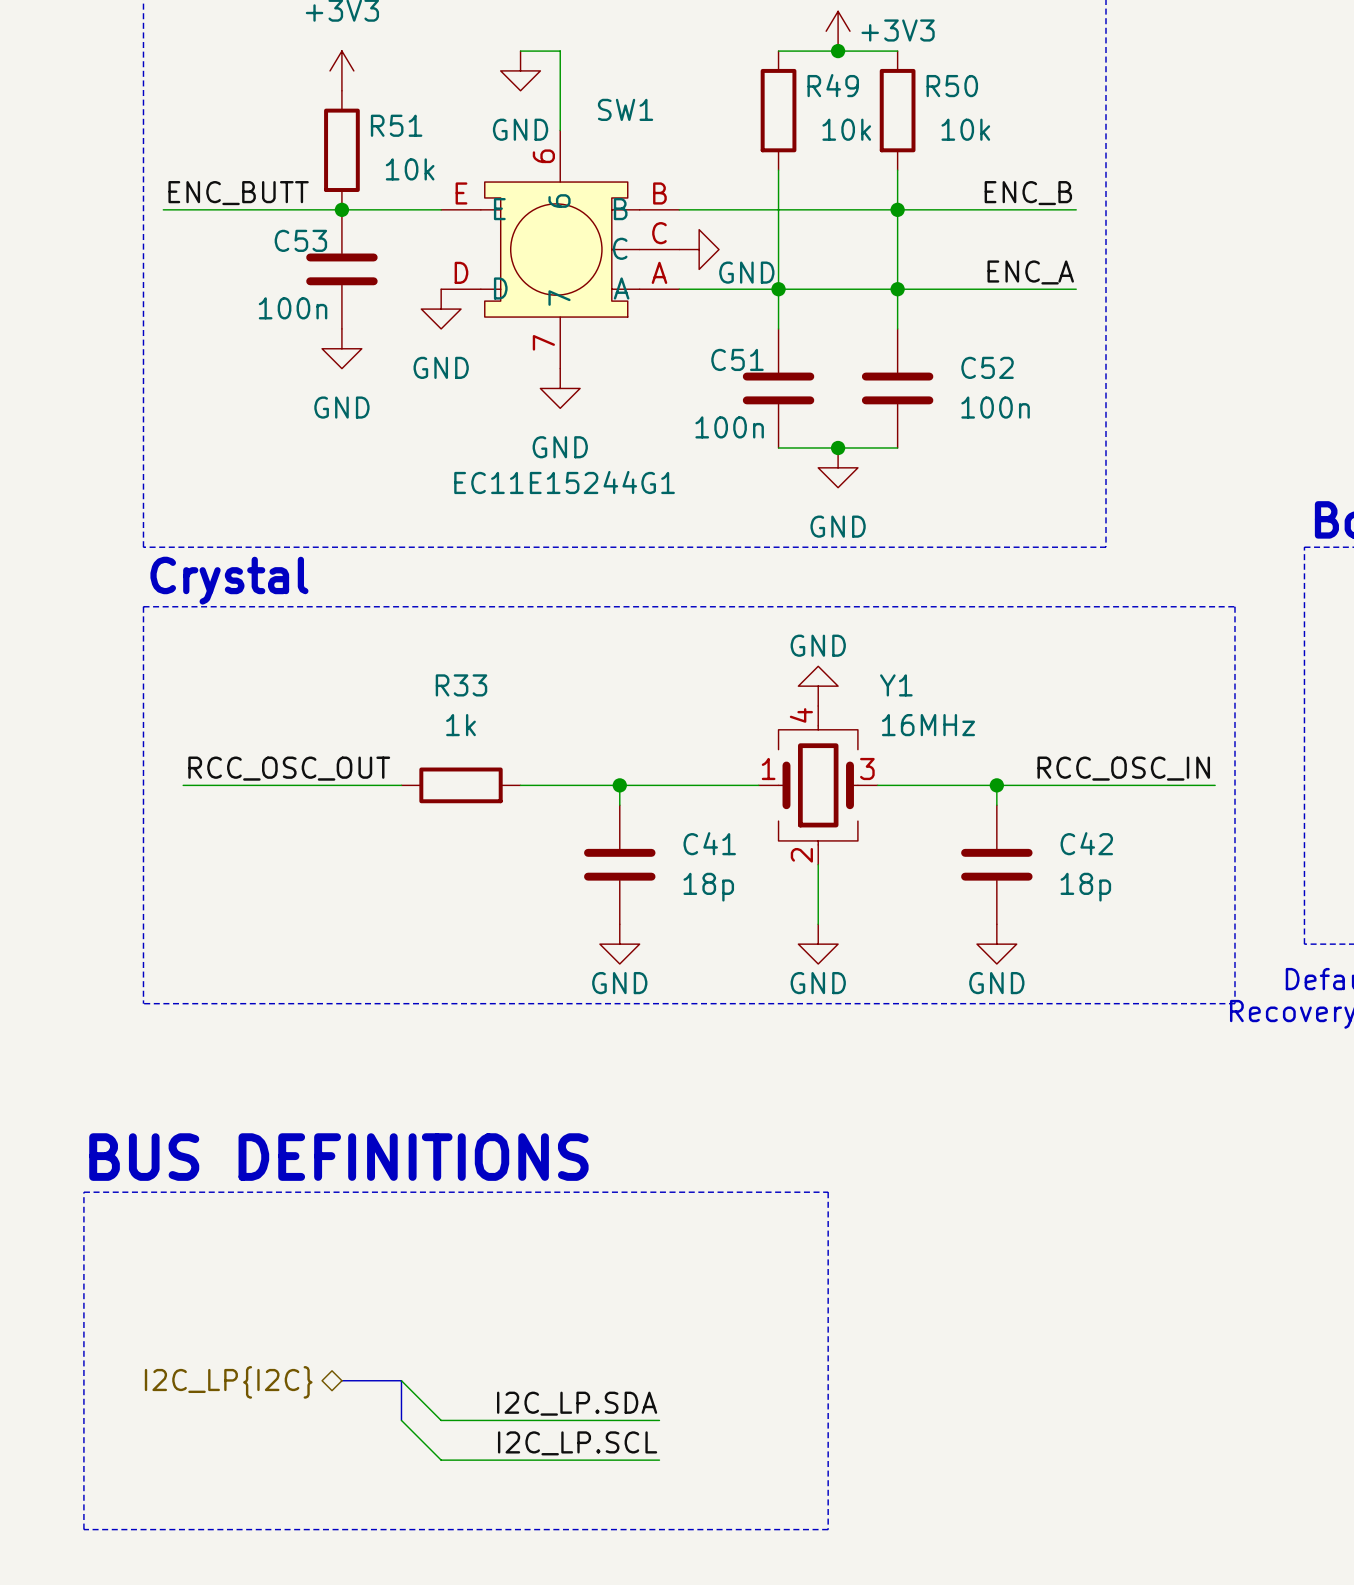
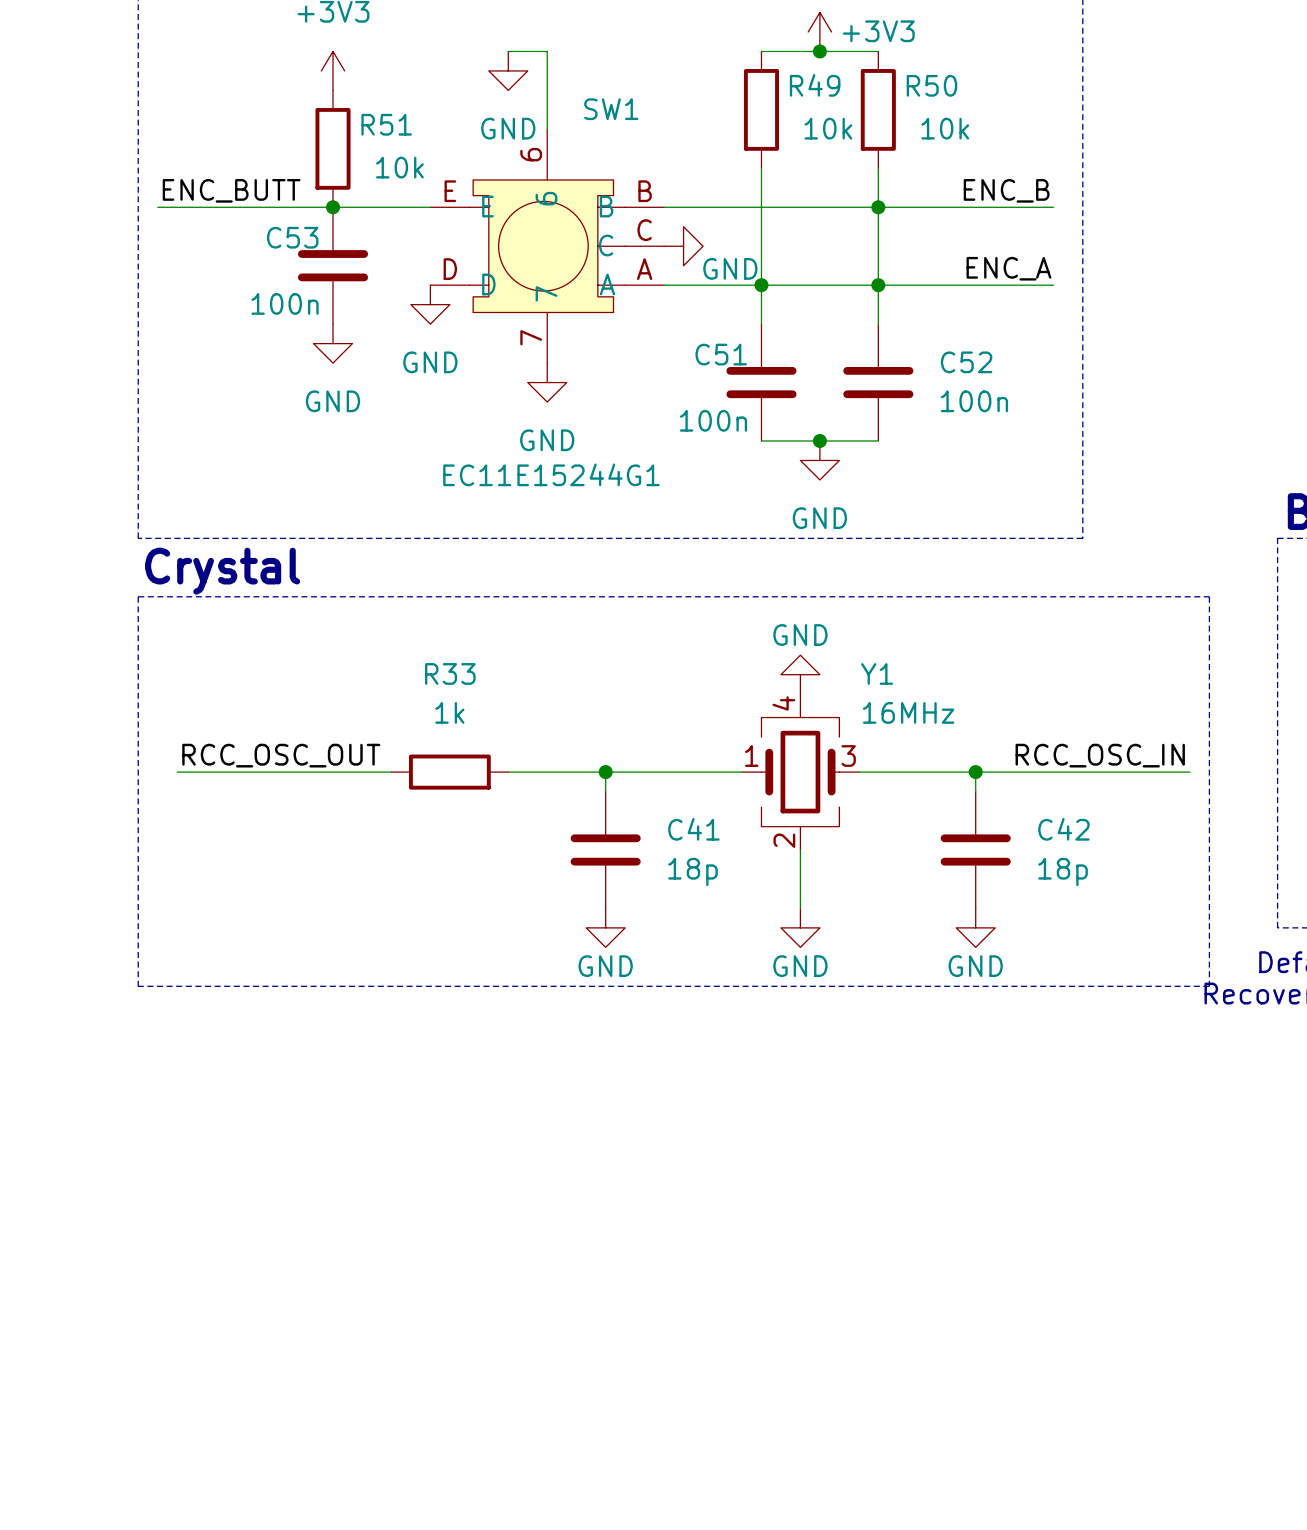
text: BUS DEFINITIONS (338, 1157) -> none
line: (83, 1192) (828, 1192) (828, 1529) (83, 1529) (83, 1192) -> none
bus: (341, 1380) (401, 1380) (401, 1420) -> none
wire: (401, 1380) (441, 1420) (659, 1420) -> none
hierarchical label: I2C_LP{I2C} (228, 1382) -> none
label: I2C_LP.SDA (577, 1403) -> none
wire: (401, 1420) (441, 1460) (659, 1460) -> none
label: I2C_LP.SCL (577, 1443) -> none

